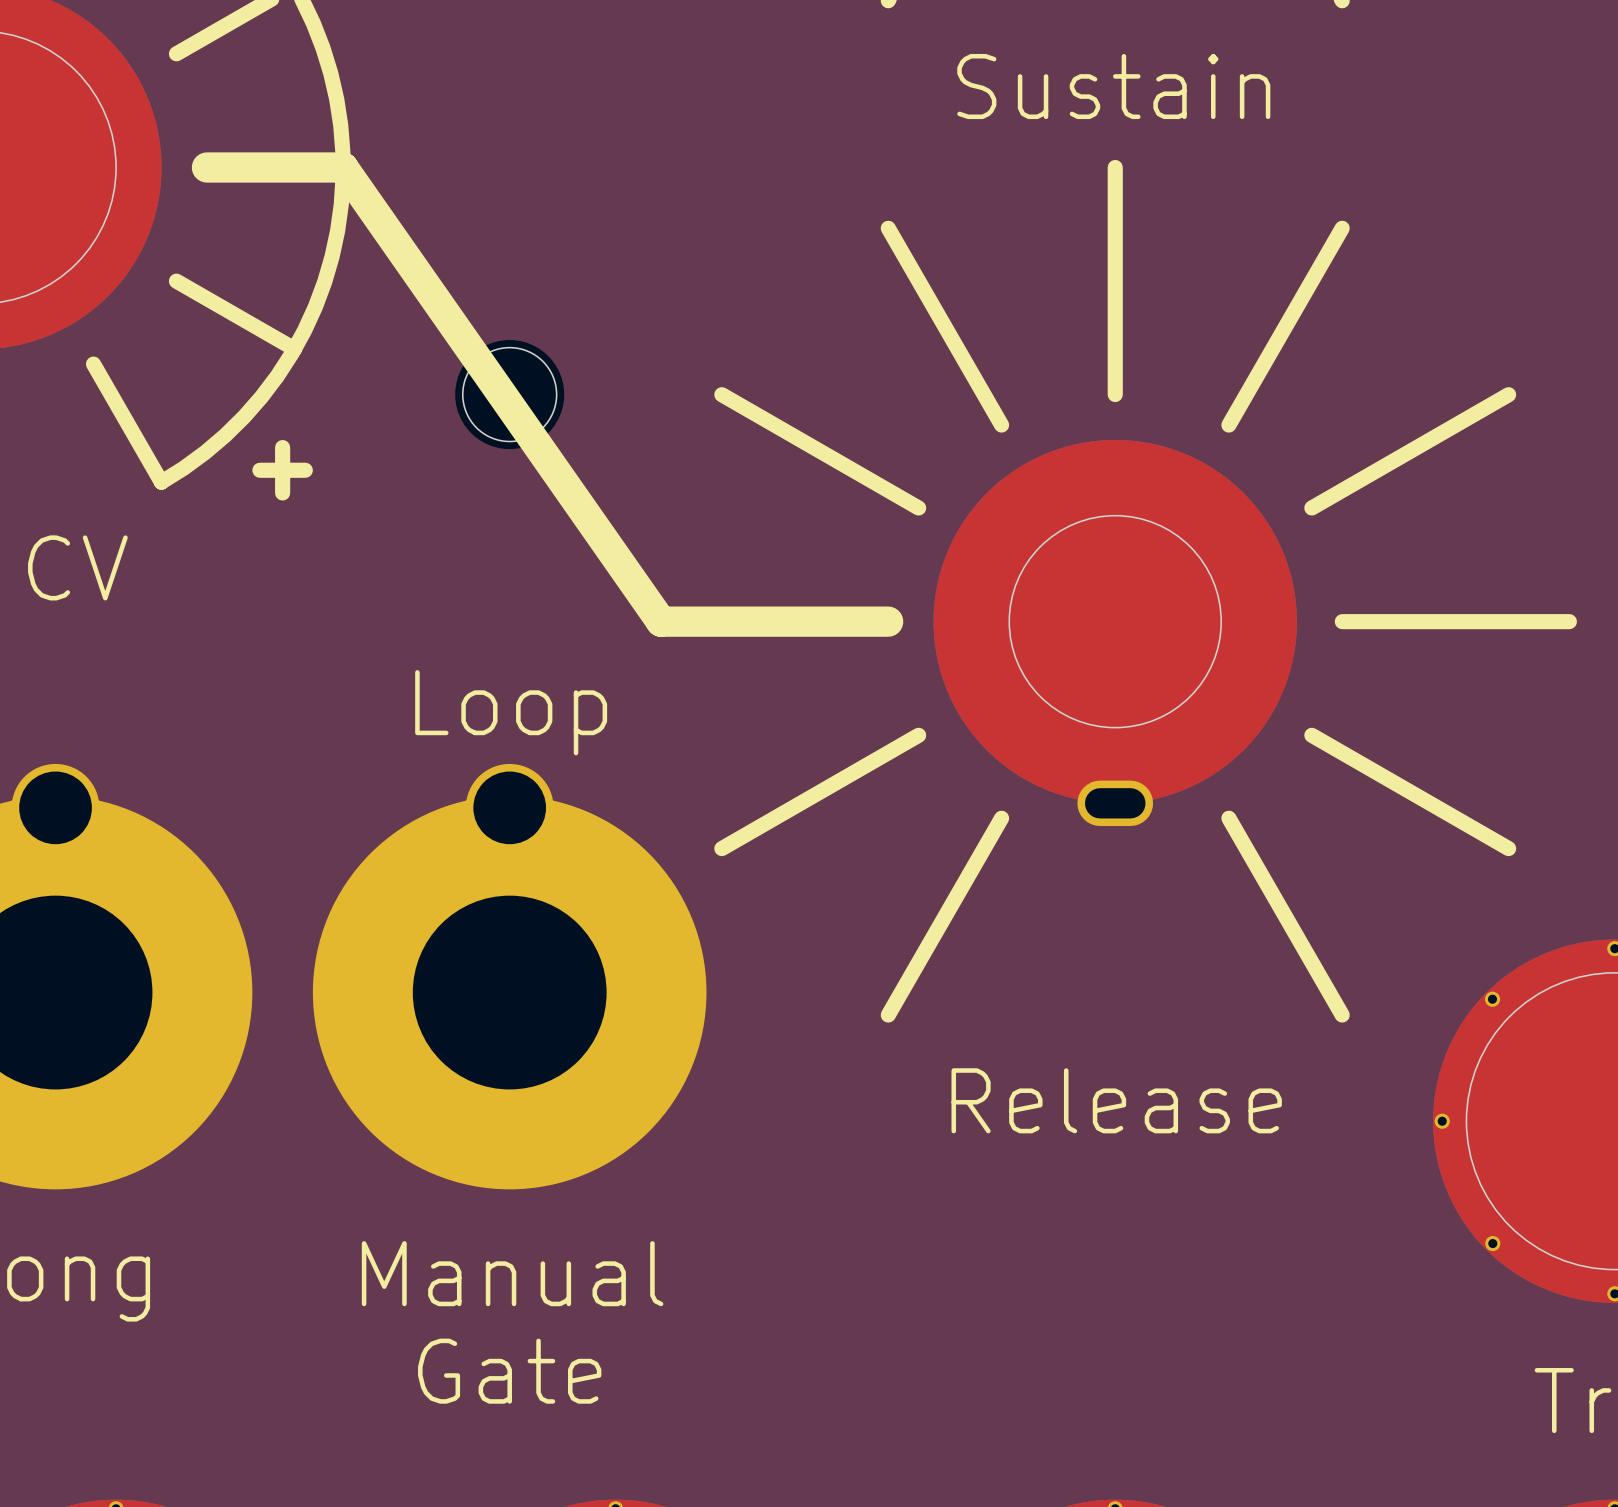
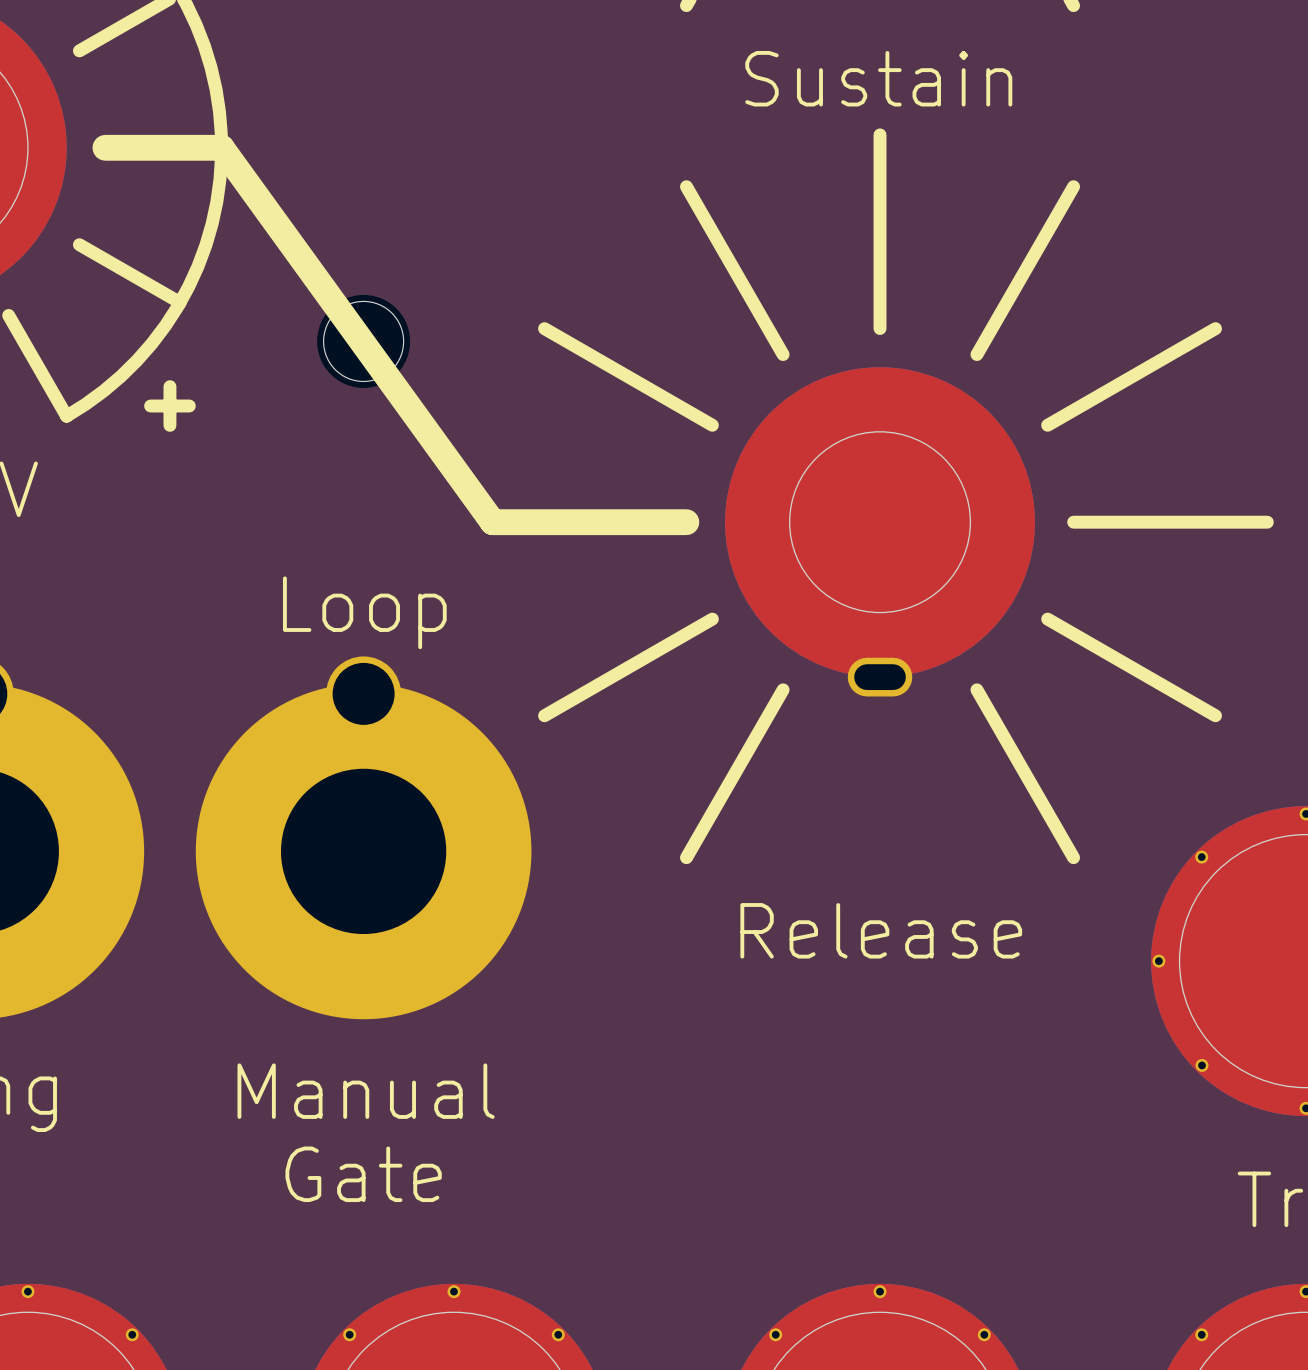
line: (343, 167) (661, 621) (888, 621) -> (221, 147) (492, 522) (686, 522)
part position: (1115, 591) -> (880, 496)

